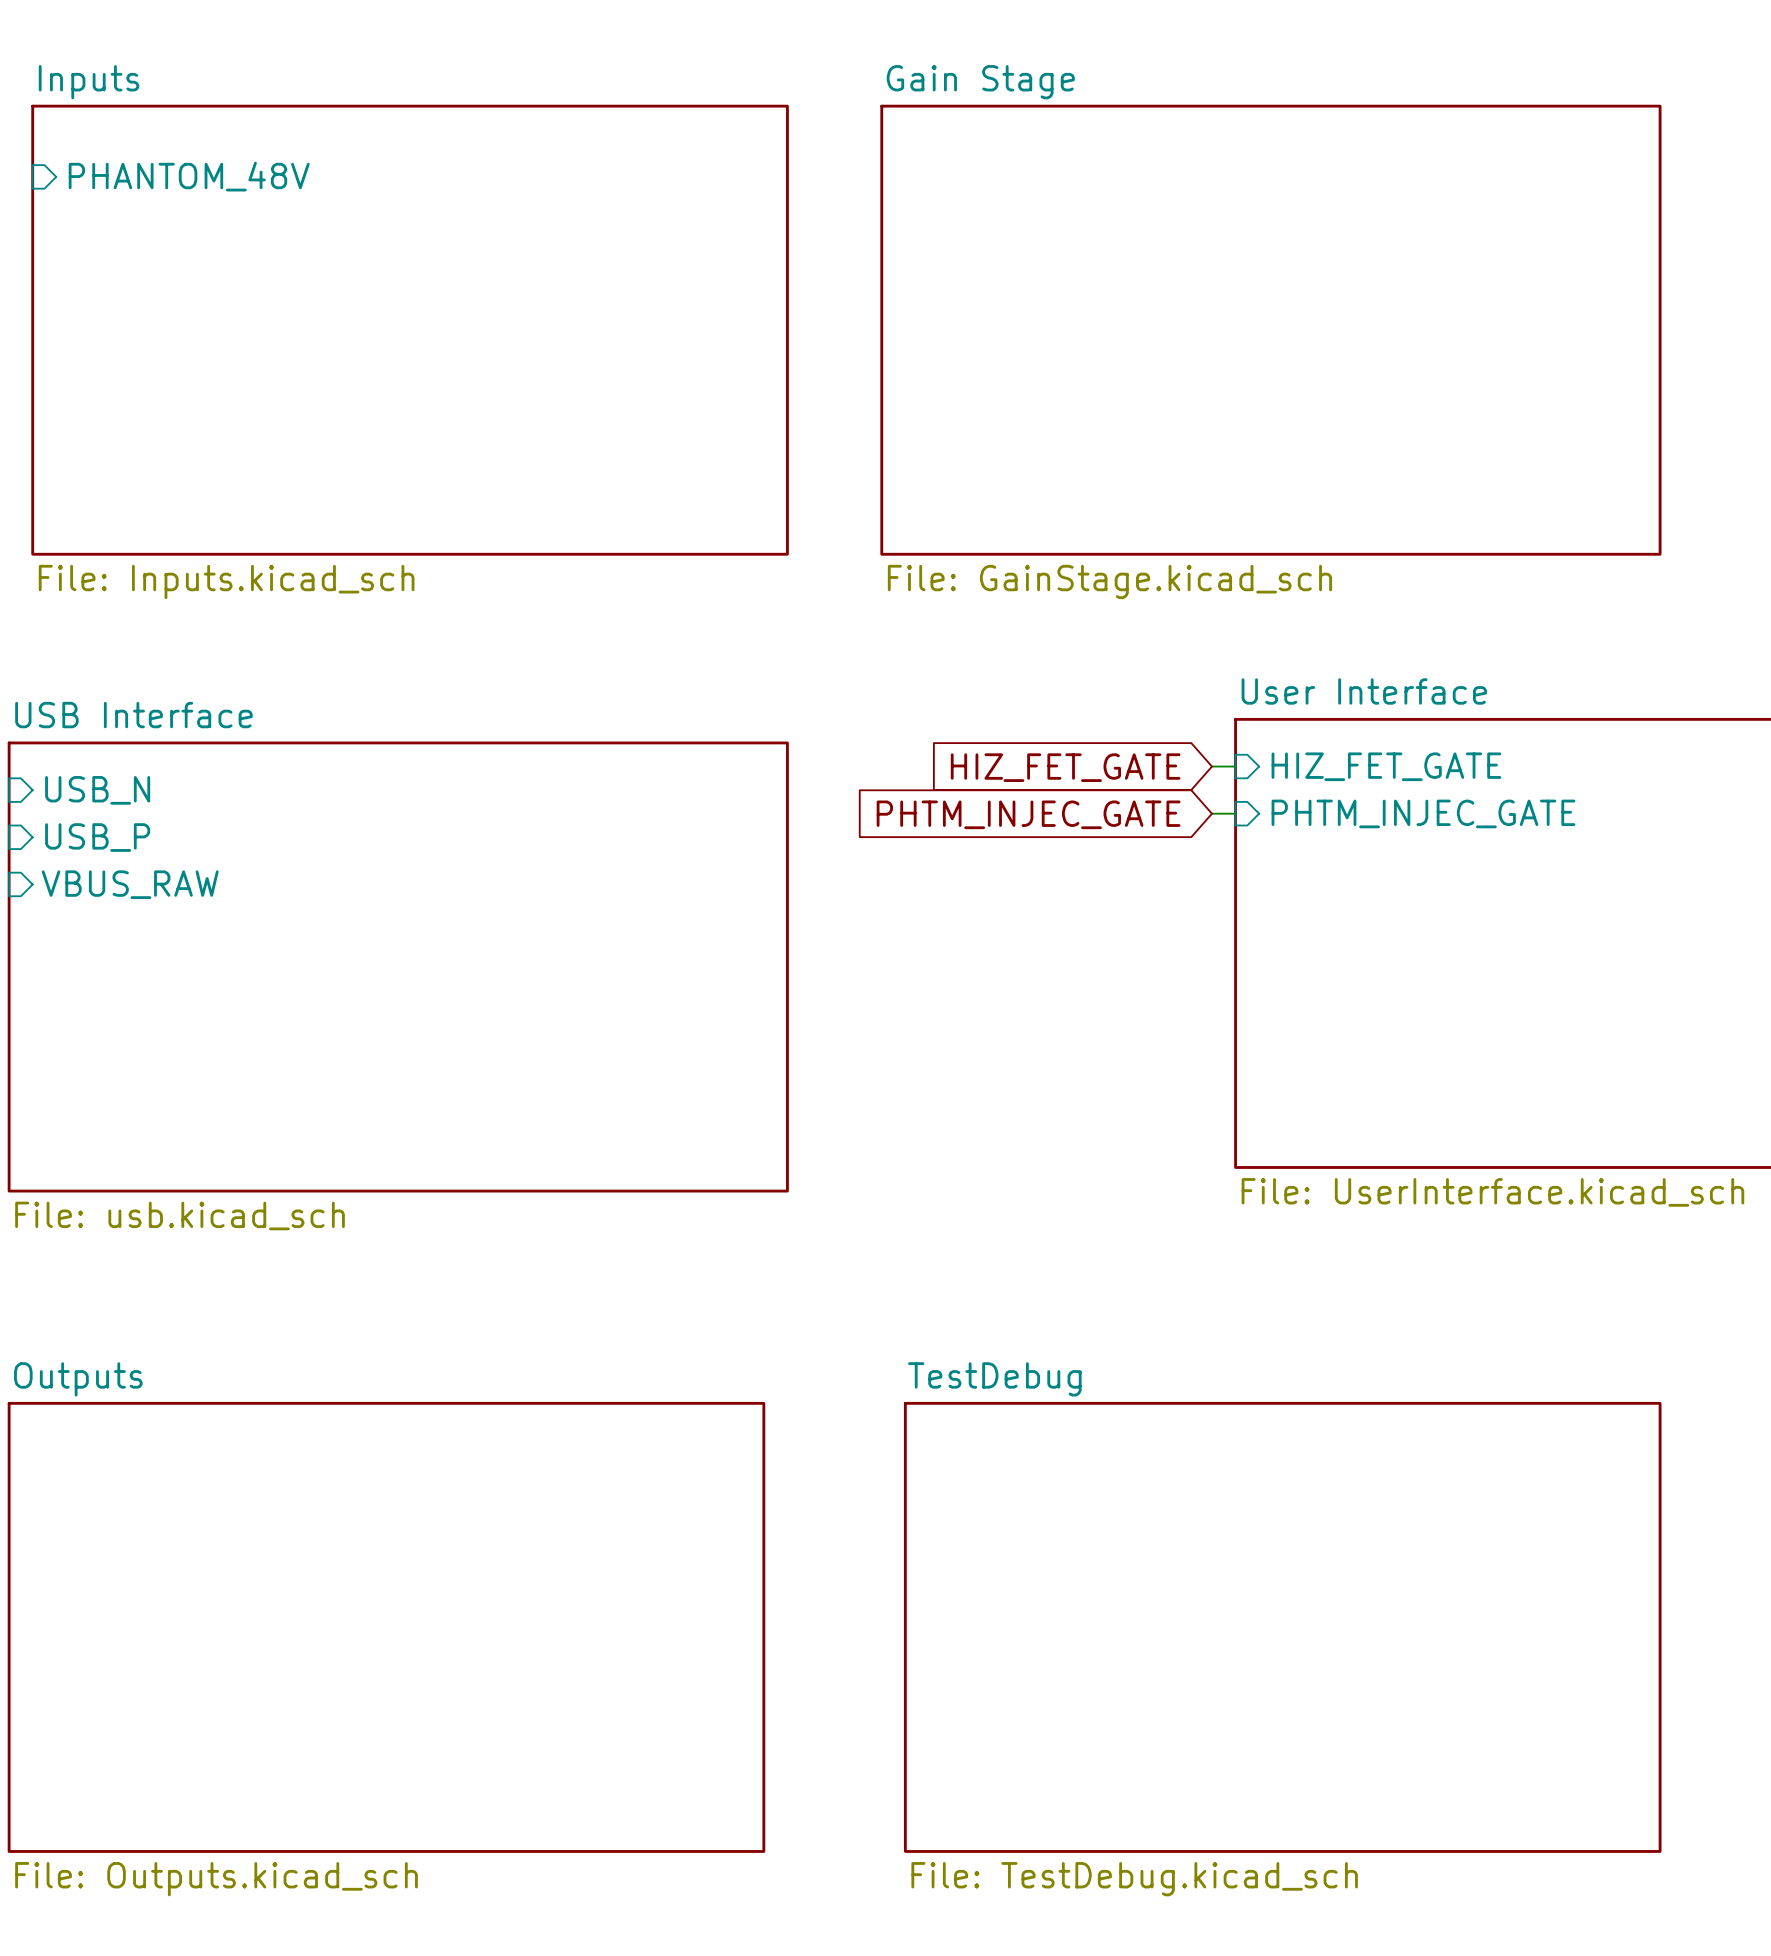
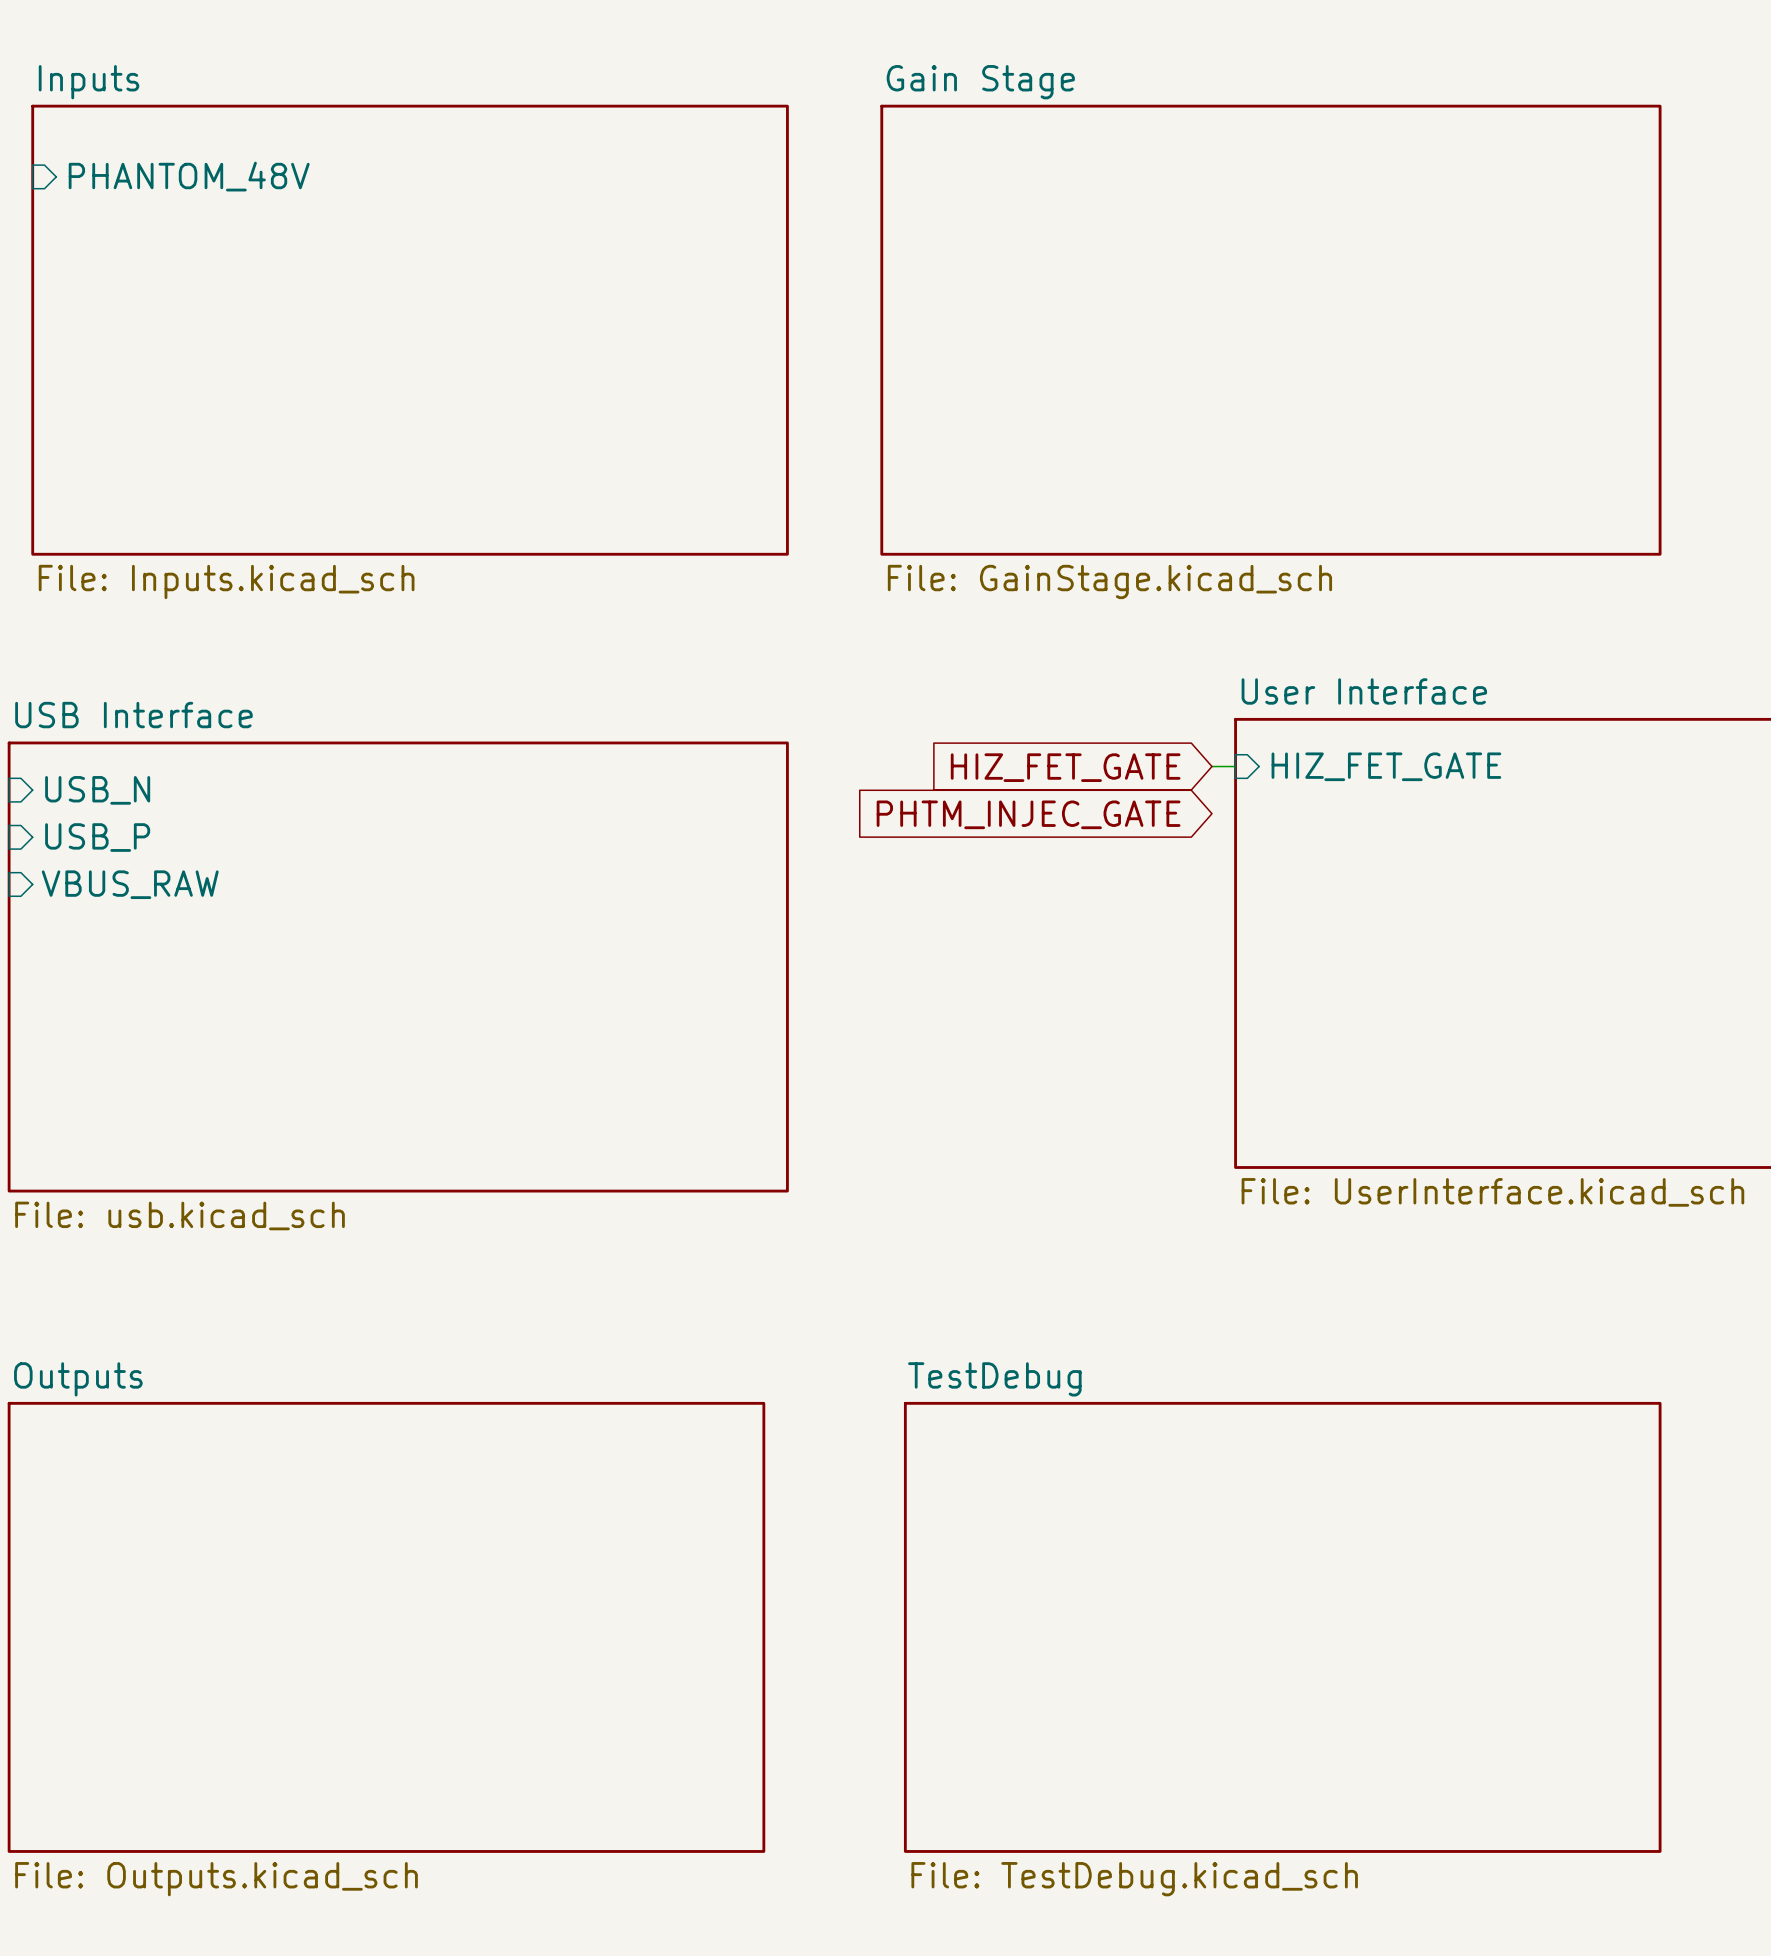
wire: (1211, 813) (1235, 813) -> none
sheet pin: PHTM_INJEC_GATE (1423, 813) -> none

